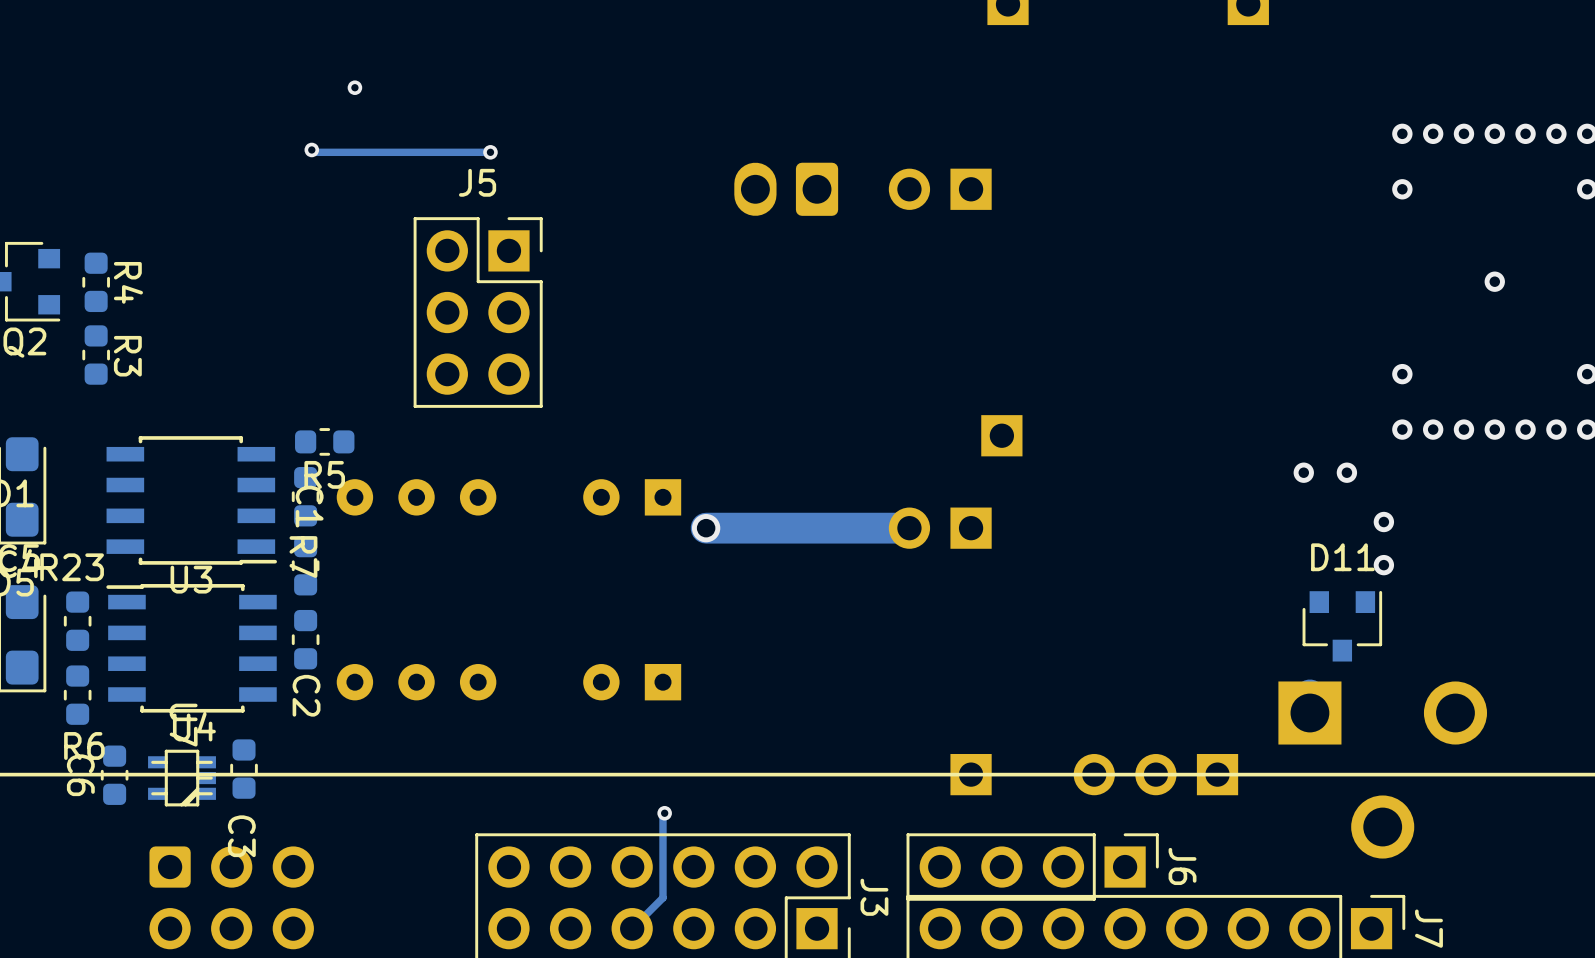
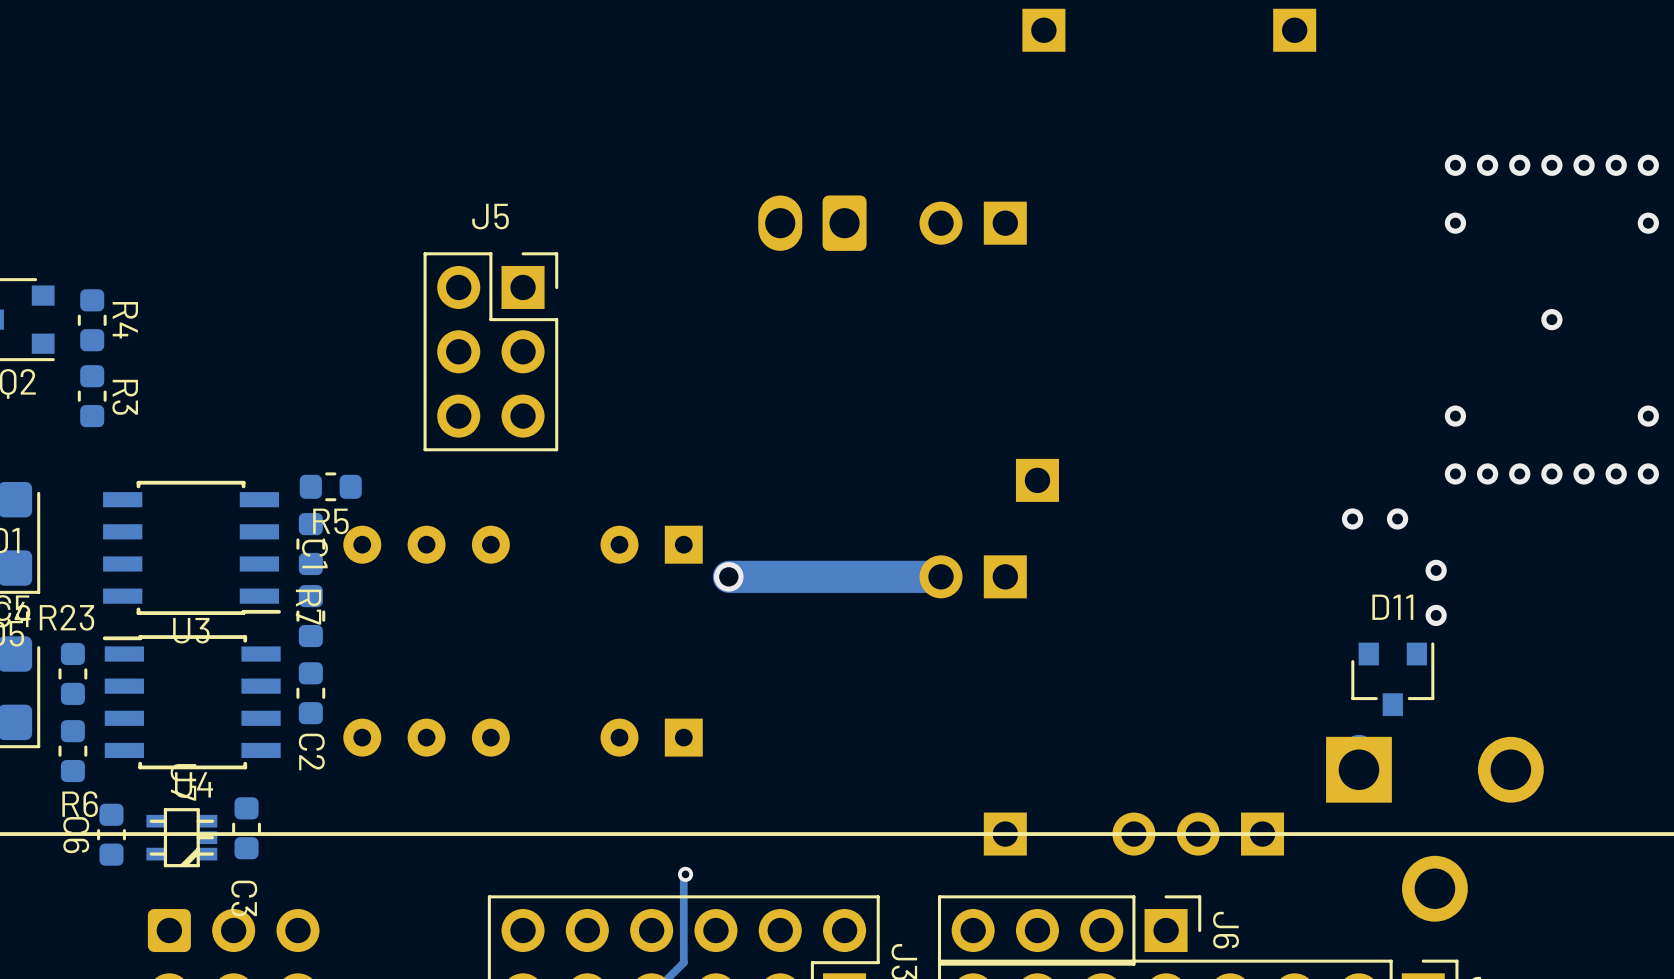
via: (354, 87) -> none
track: (311, 149) (314, 152) (490, 152) -> none
via: (311, 149) -> none
via: (490, 152) -> none

